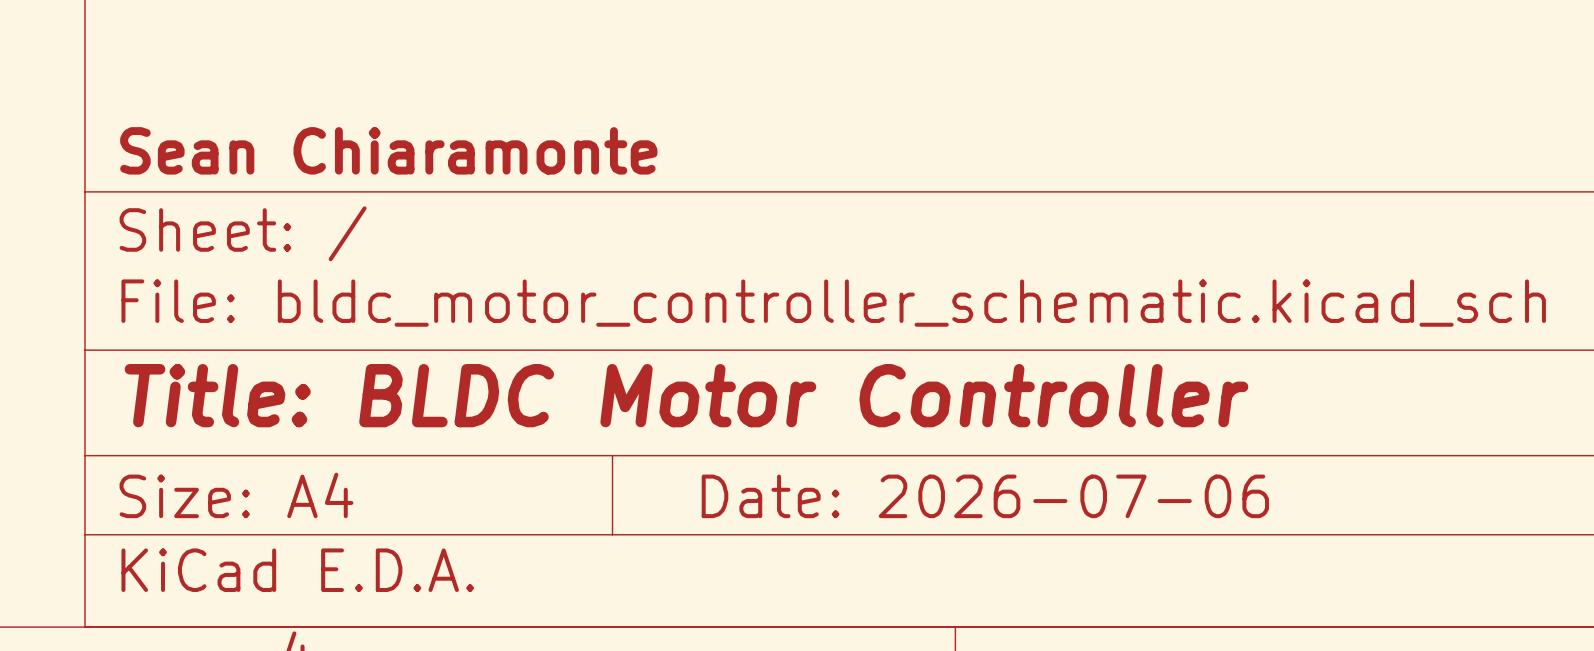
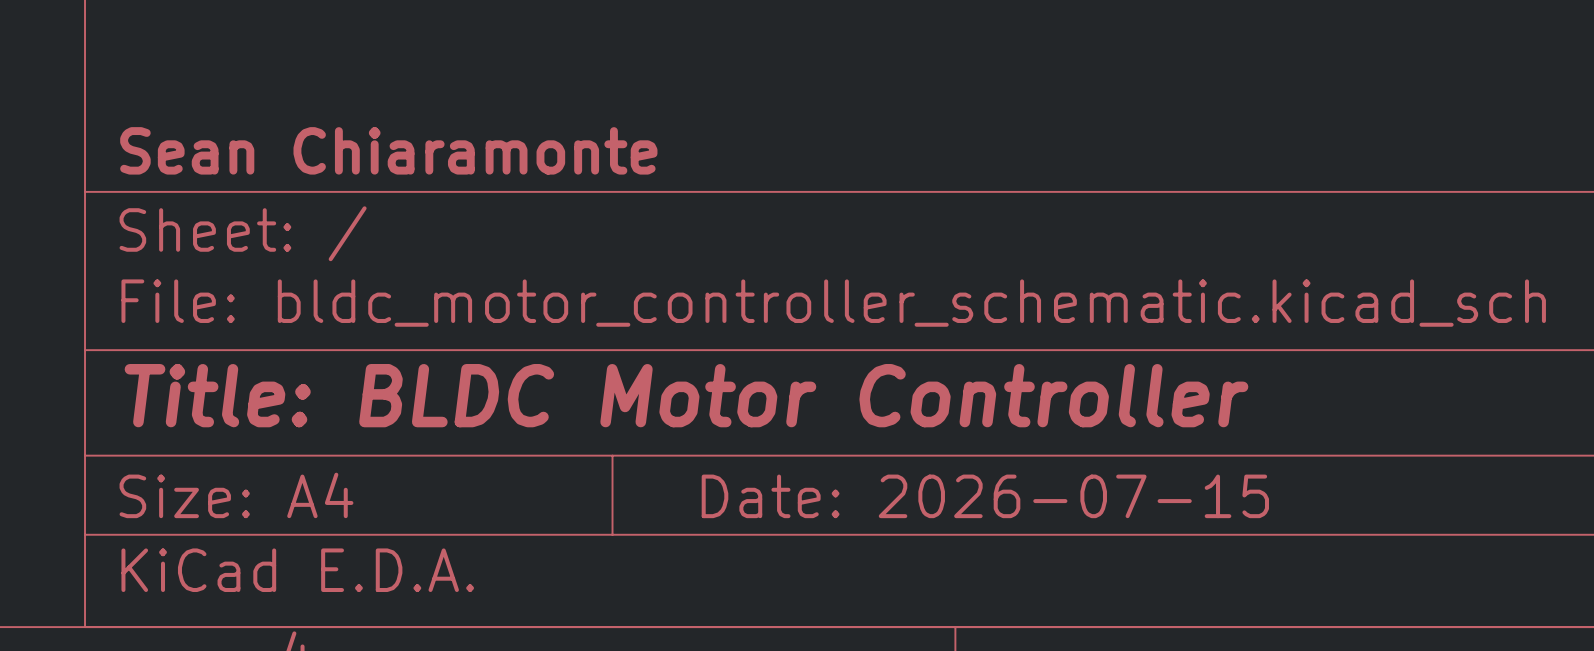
title block: Date: 2026-07-06 (985, 496) -> Date: 2026-07-15 (985, 496)

